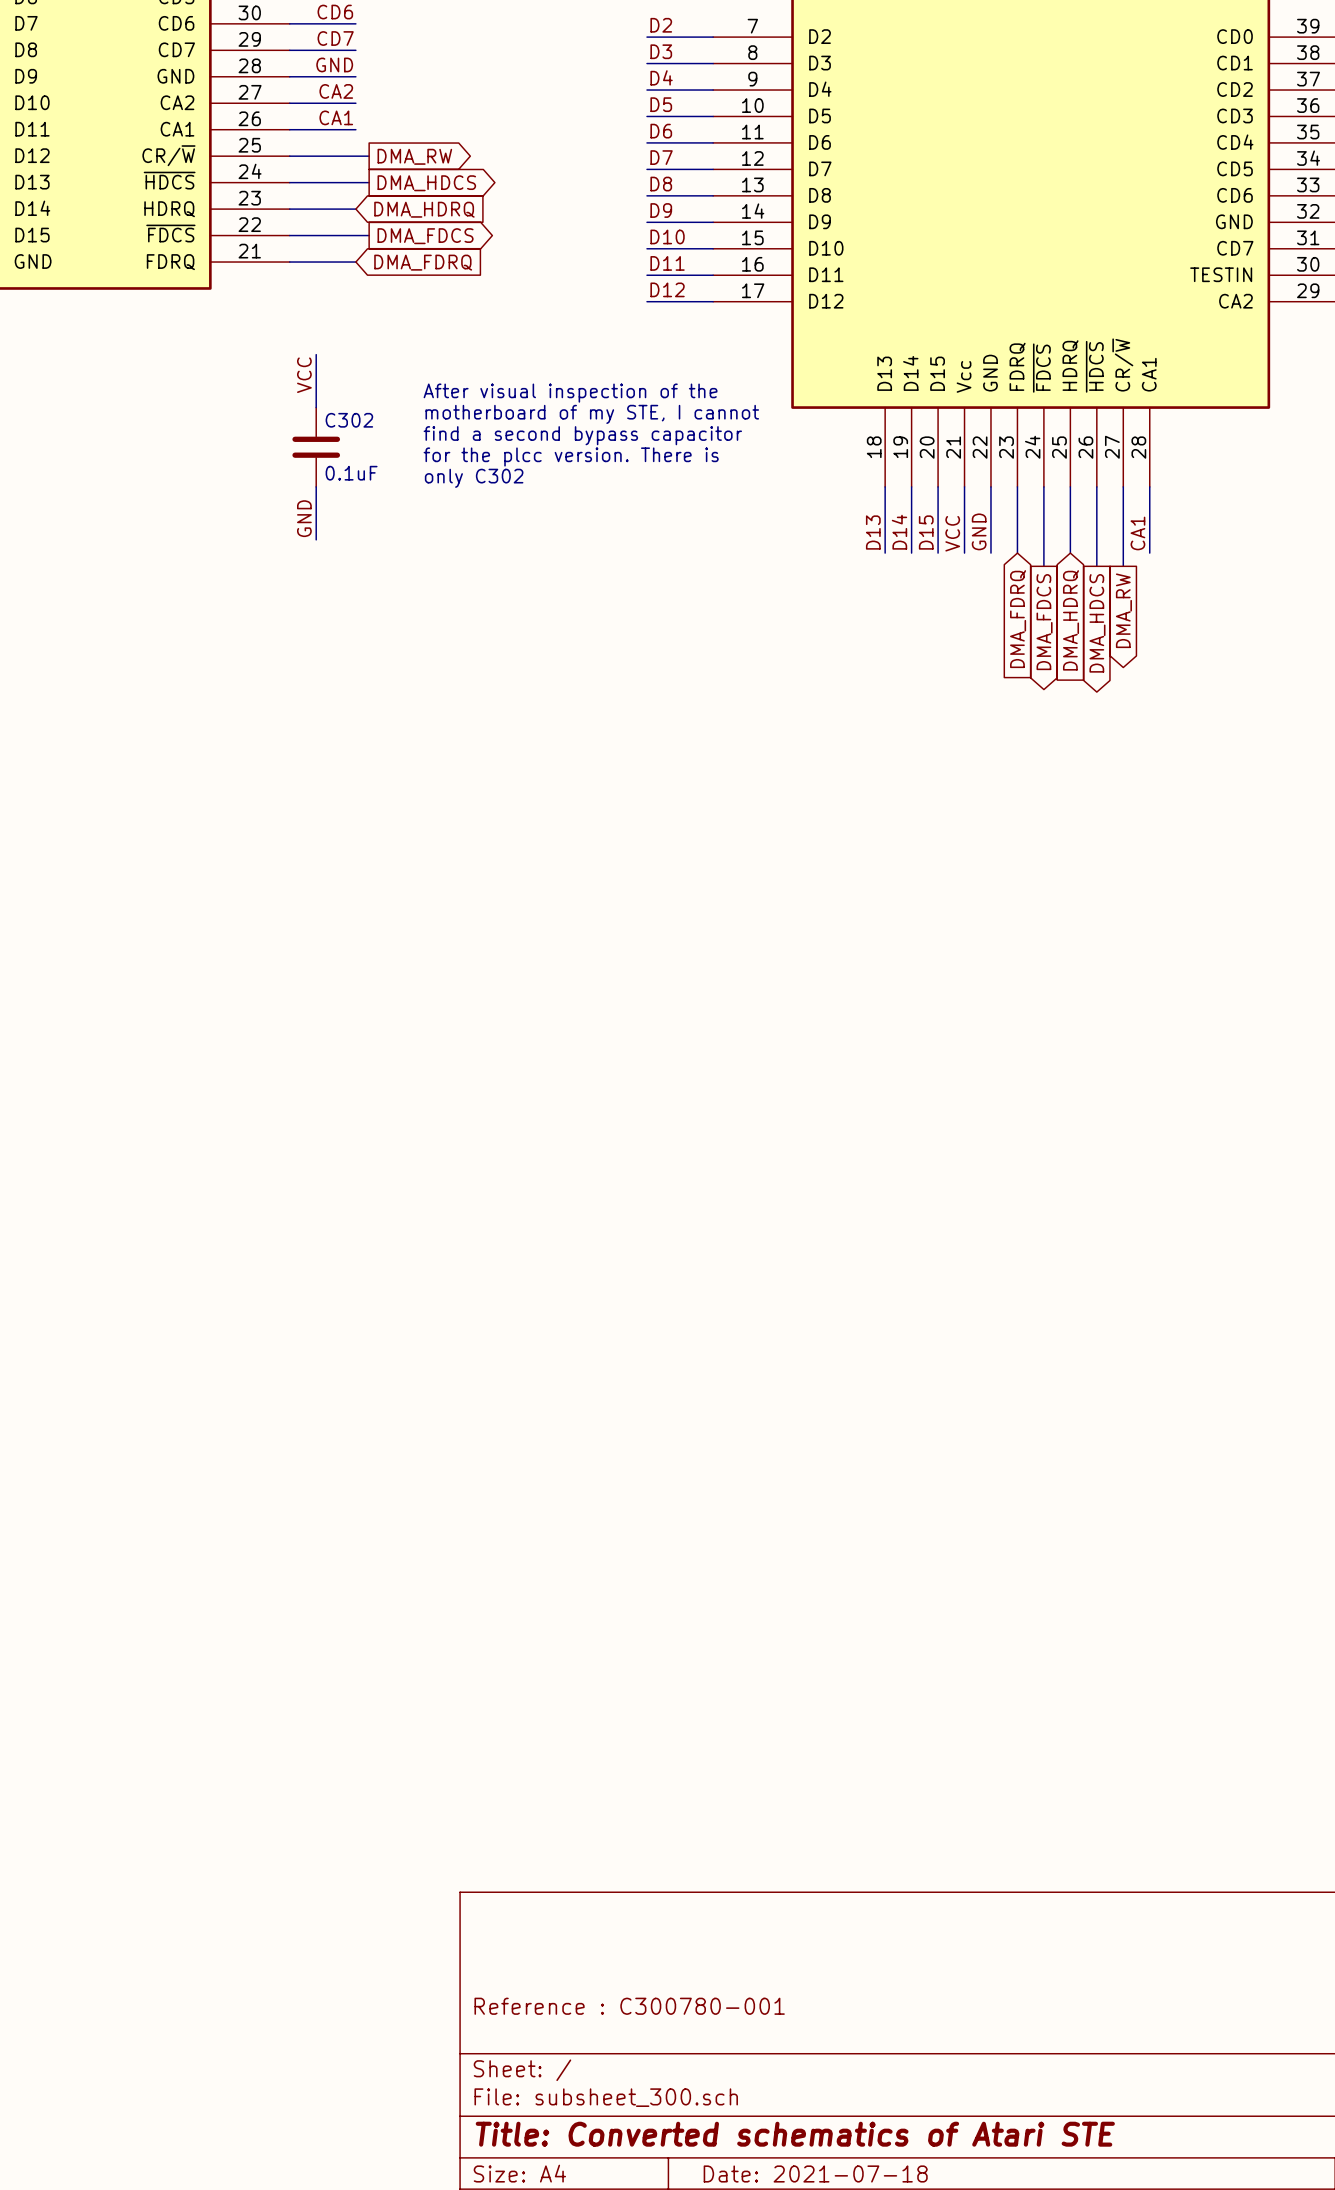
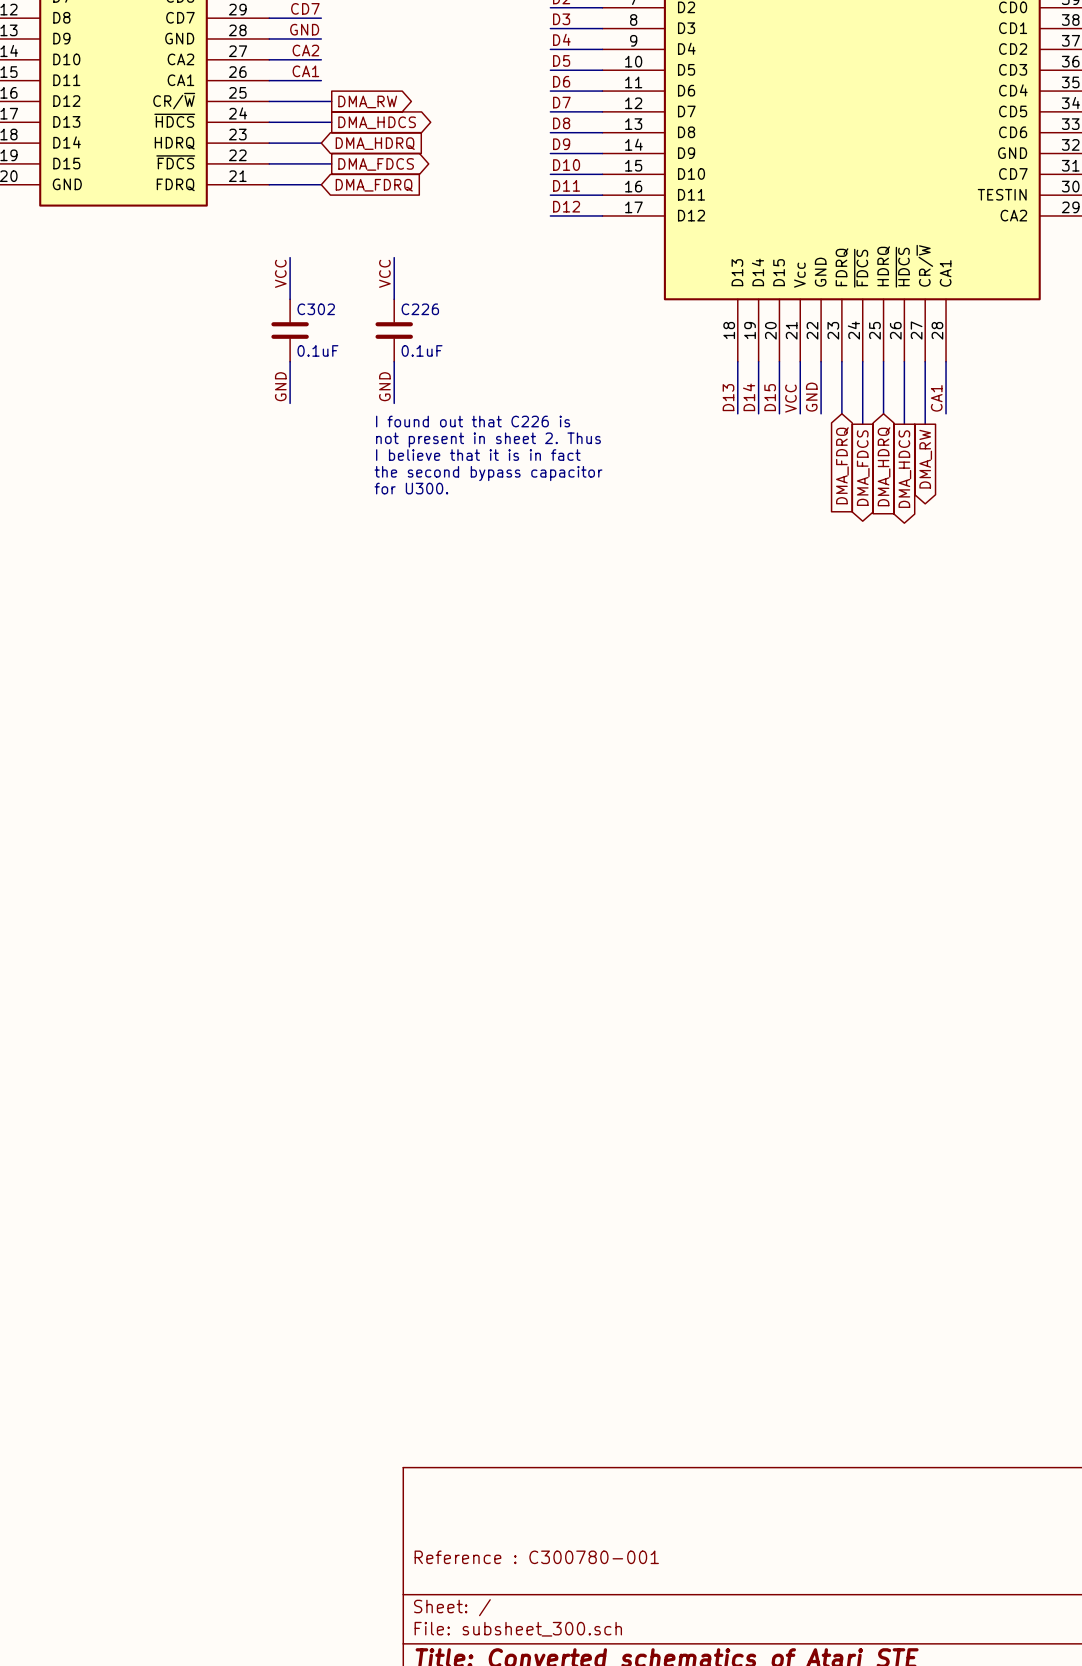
wire: none -> (394, 257) (394, 299)
label: none -> VCC (384, 273)
text: After visual inspection of the (570, 393) -> none
text: motherboard of my STE, I cannot (592, 414) -> none
text: find a second bypass capacitor (582, 435) -> none
C226: none -> 0.1uF (394, 330)
text: for the plcc version. There is (571, 457) -> none
text: only C302 (474, 478) -> none
wire: none -> (394, 361) (394, 403)
label: none -> GND (384, 386)
text: none -> I found out that C226 is (473, 421)
text: none -> not present in sheet 2. Thus (488, 440)
text: none -> I believe that it is in fact (478, 455)
text: none -> the second bypass capacitor (488, 473)
text: none -> for U300. (411, 488)

